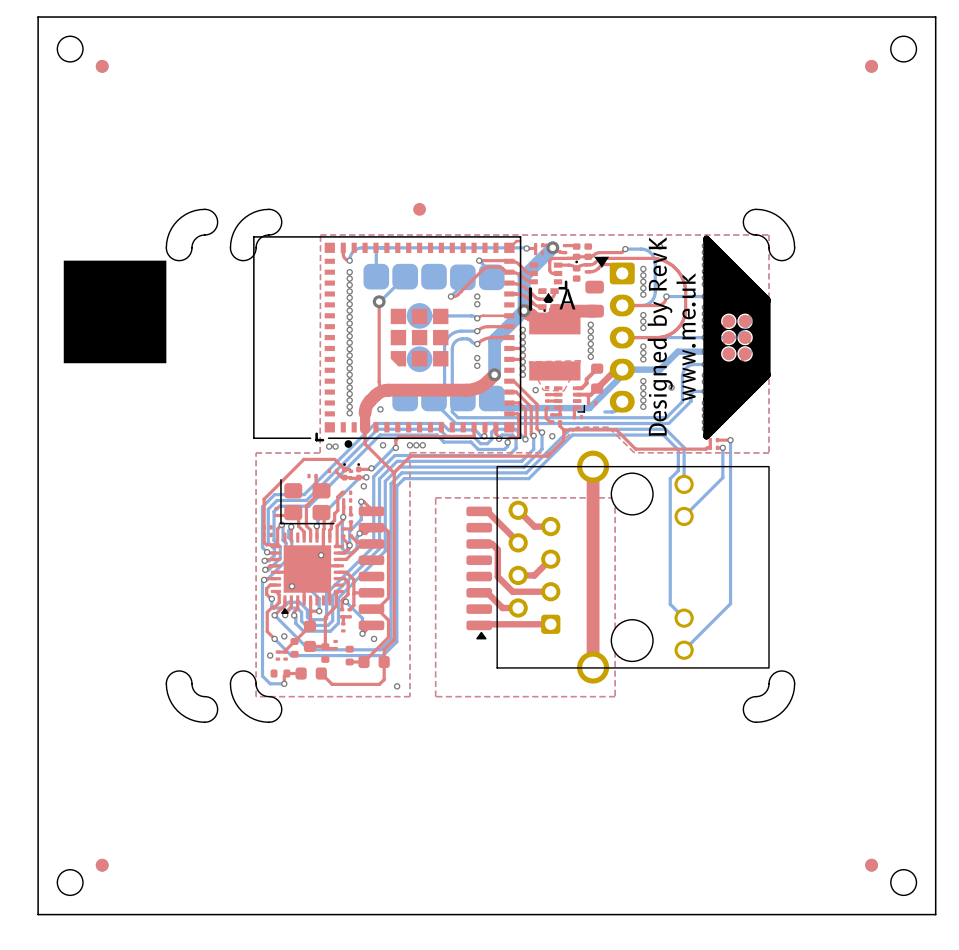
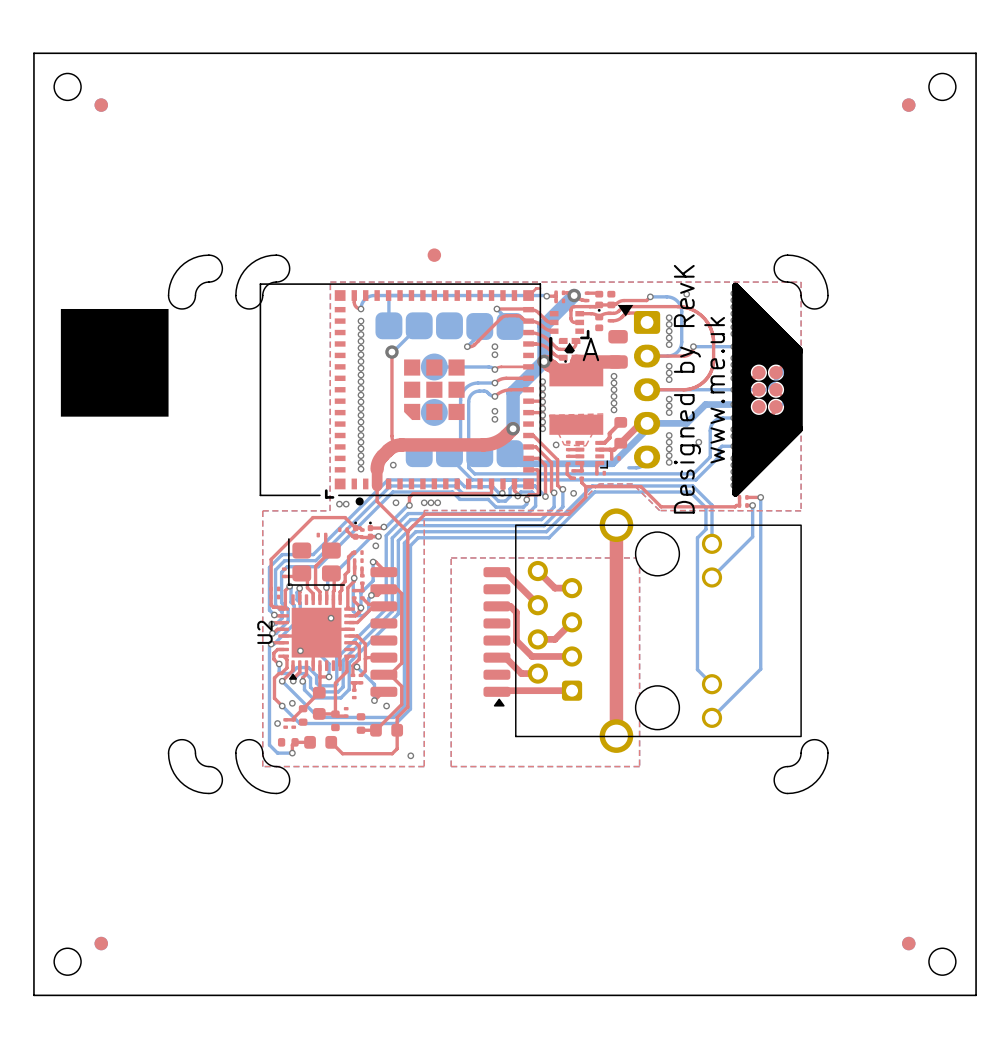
U2 name: none -> U2 (264, 632)

